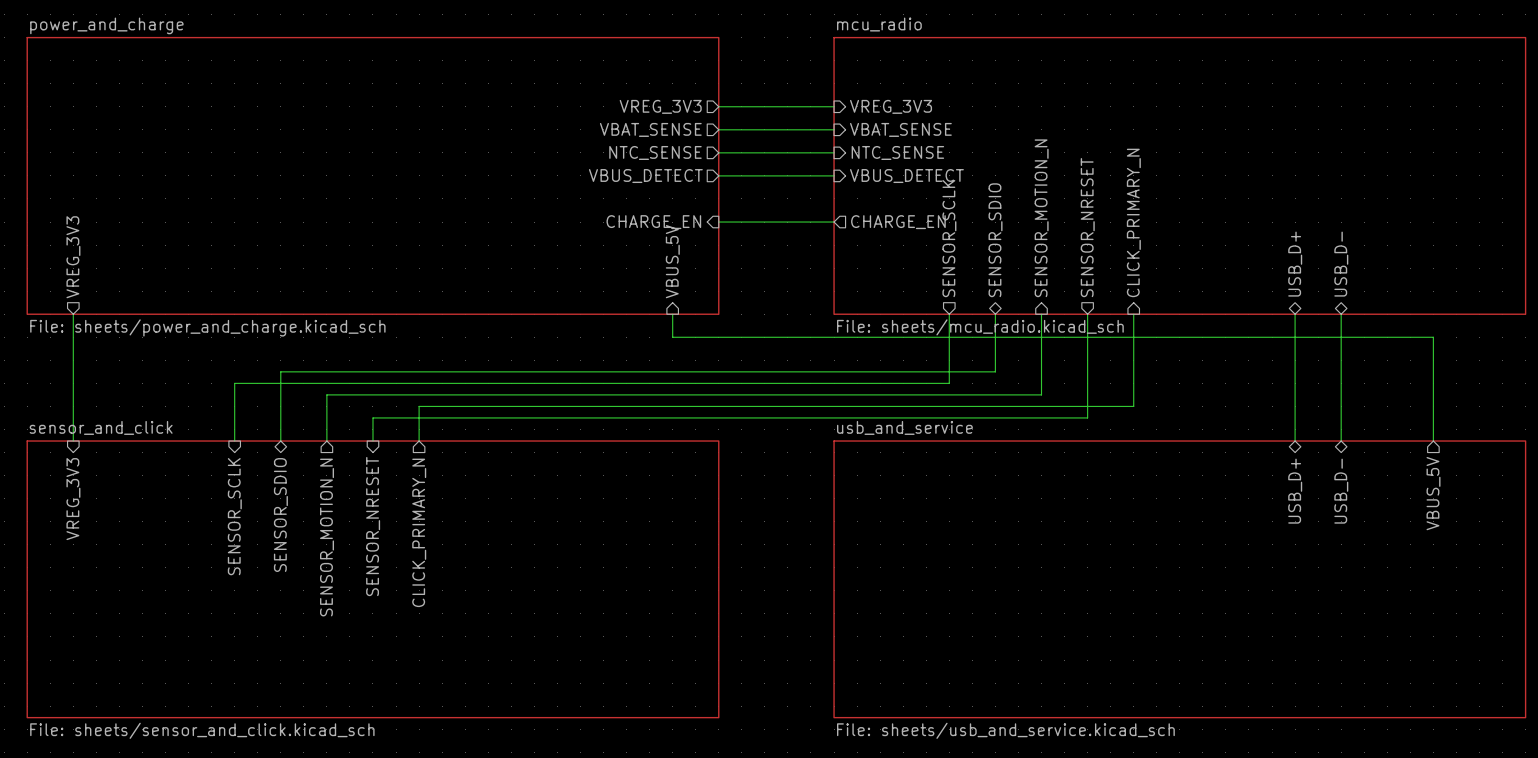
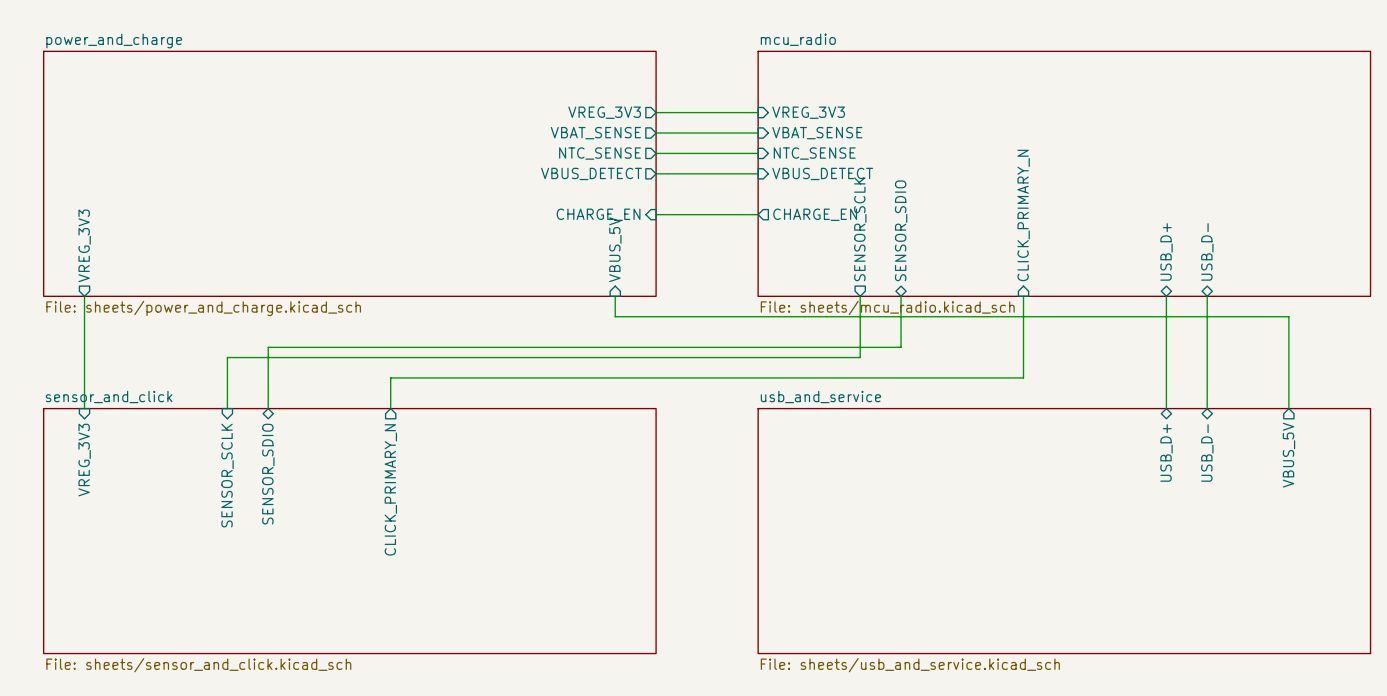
sheet pin: SENSOR_MOTION_N (1041, 218) -> none
sheet pin: SENSOR_NRESET (1087, 227) -> none
wire: (1041, 314) (1041, 394) (326, 394) (326, 441) -> none
wire: (1087, 314) (1087, 417) (372, 417) (372, 441) -> none
sheet pin: SENSOR_NRESET (373, 526) -> none
sheet pin: SENSOR_MOTION_N (327, 537) -> none

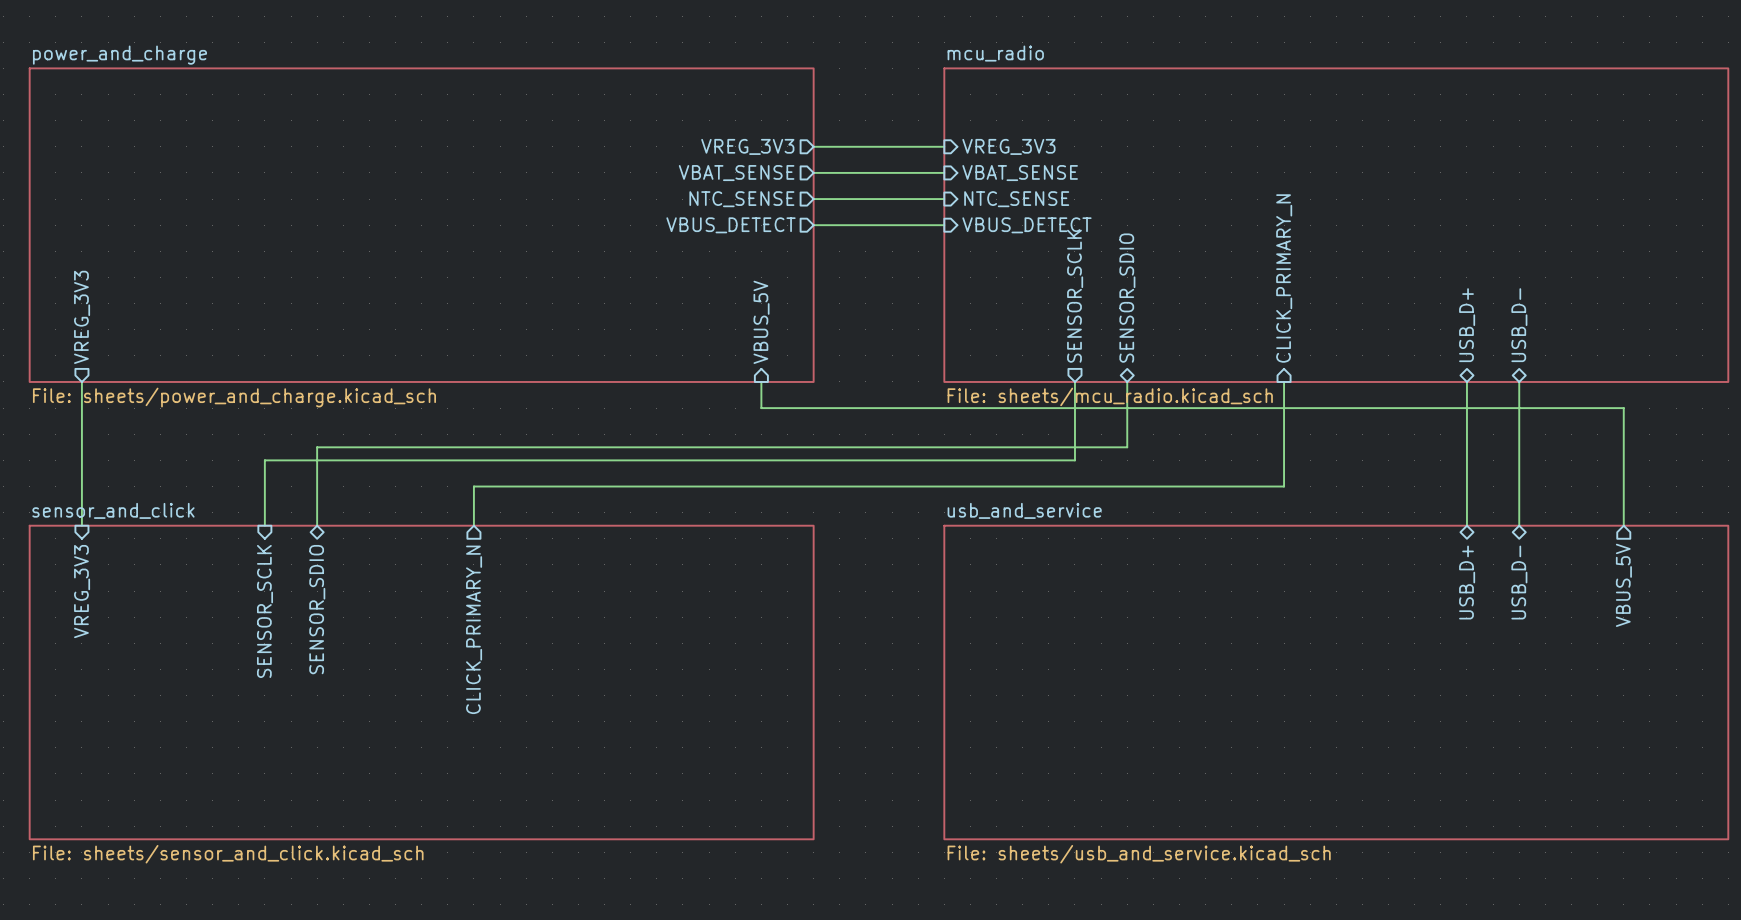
sheet pin: CHARGE_EN (598, 214) -> none
wire: (656, 214) (758, 214) -> none
sheet pin: CHARGE_EN (815, 214) -> none

